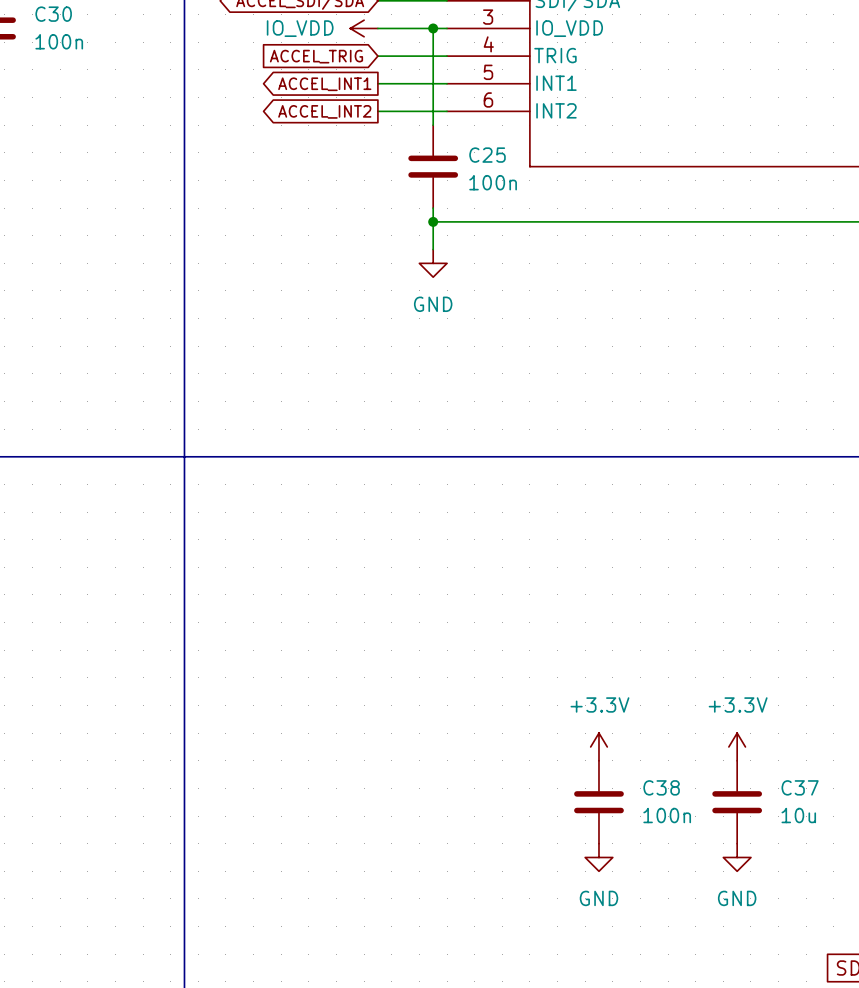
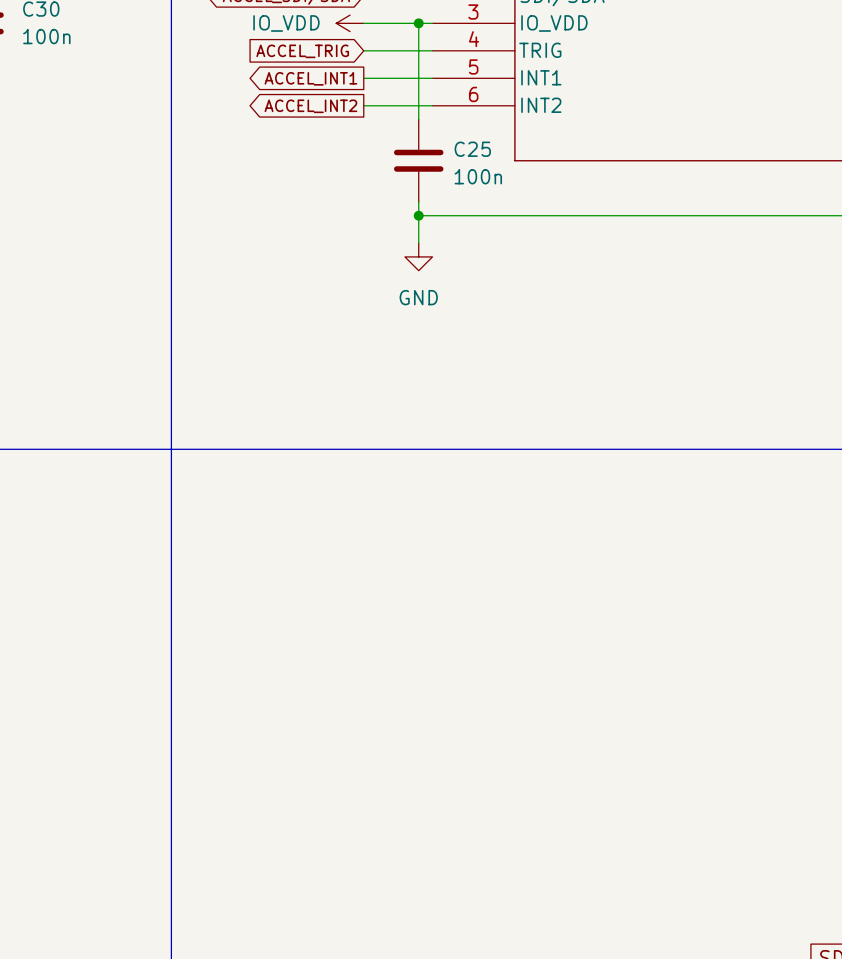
power symbol: +3.3V (598, 746) -> none
power symbol: +3.3V (737, 746) -> none
C38: 100n (598, 802) -> none
C37: 10u (737, 802) -> none
power symbol: GND (598, 857) -> none
power symbol: GND (737, 857) -> none

